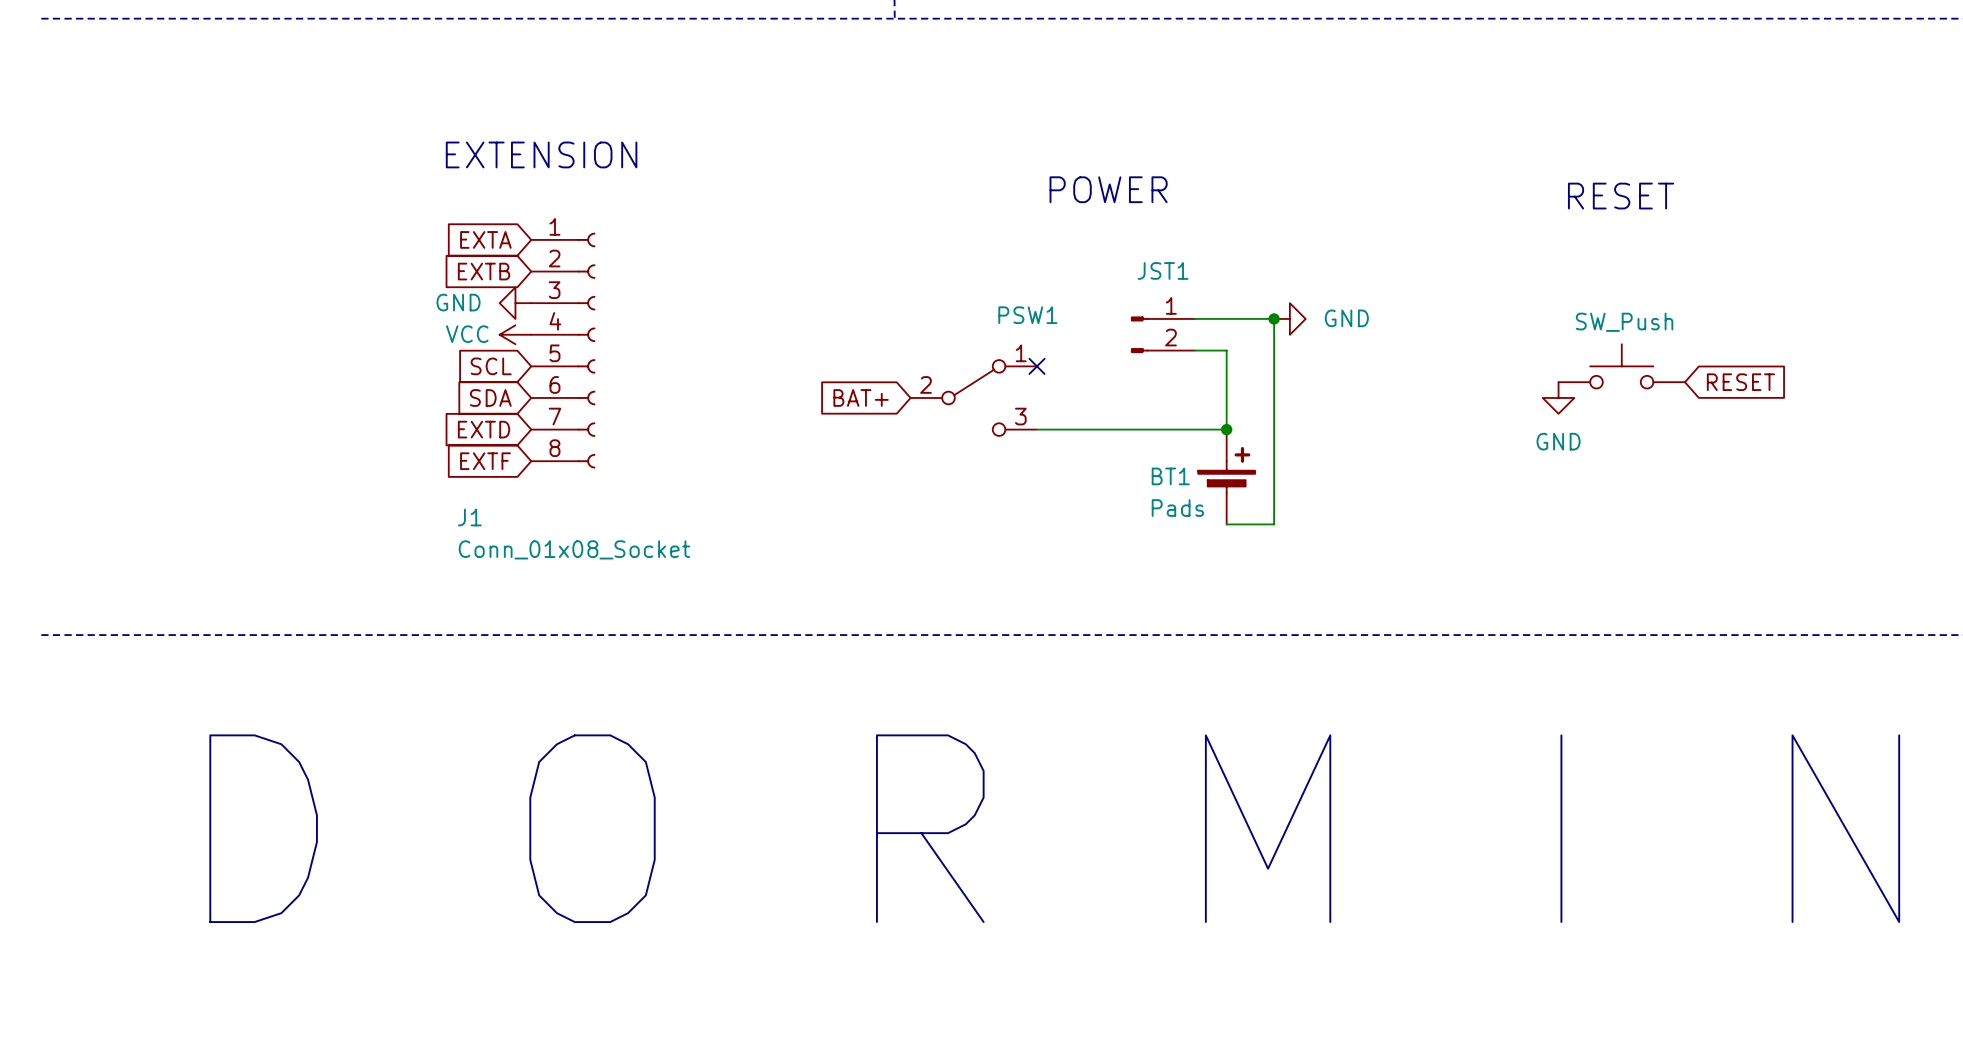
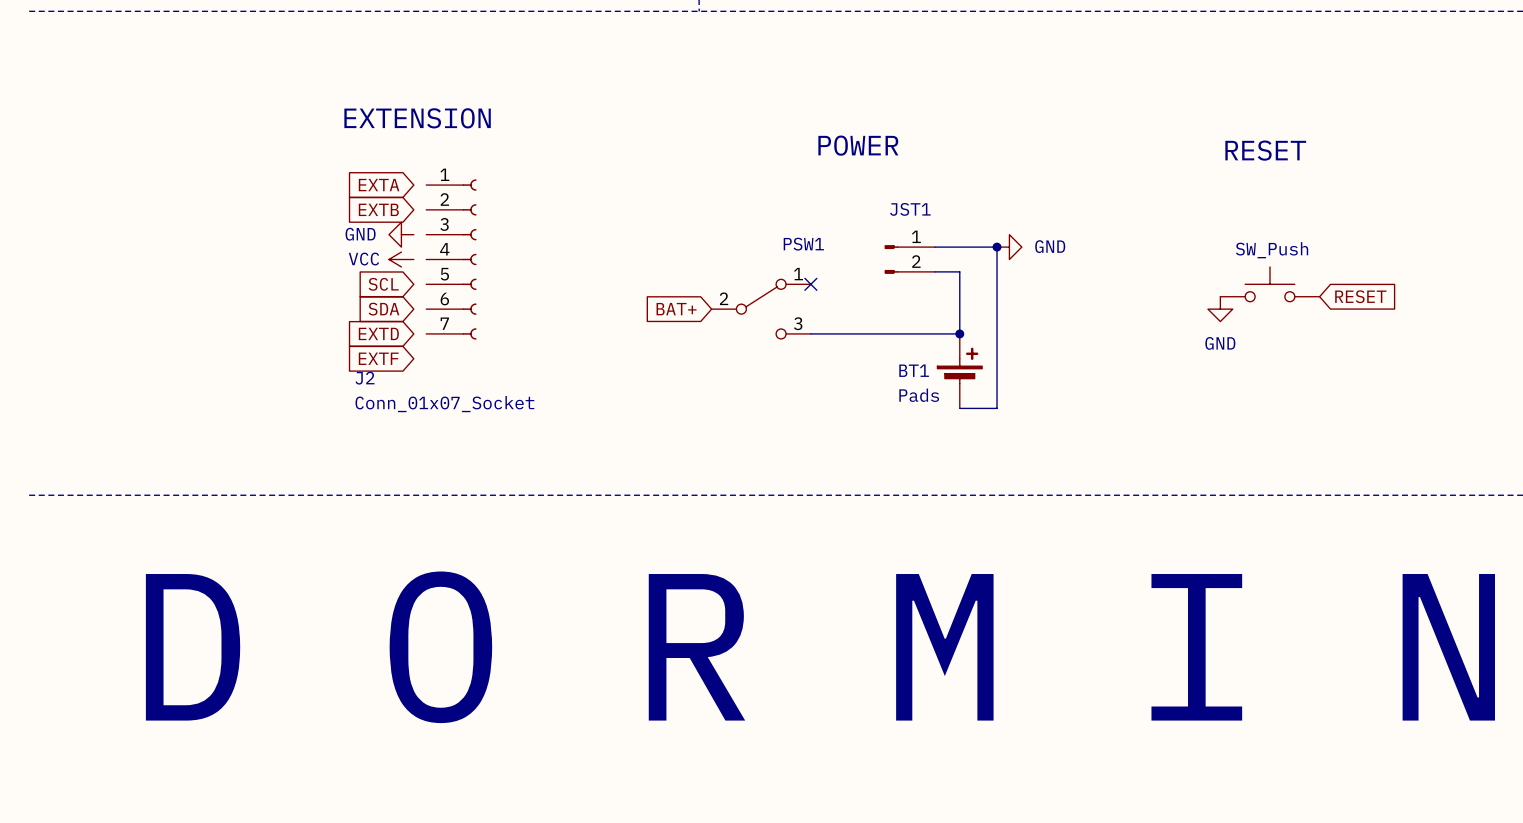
J2: none -> Conn_01x07_Socket (451, 259)
J1: Conn_01x08_Socket (563, 350) -> none

